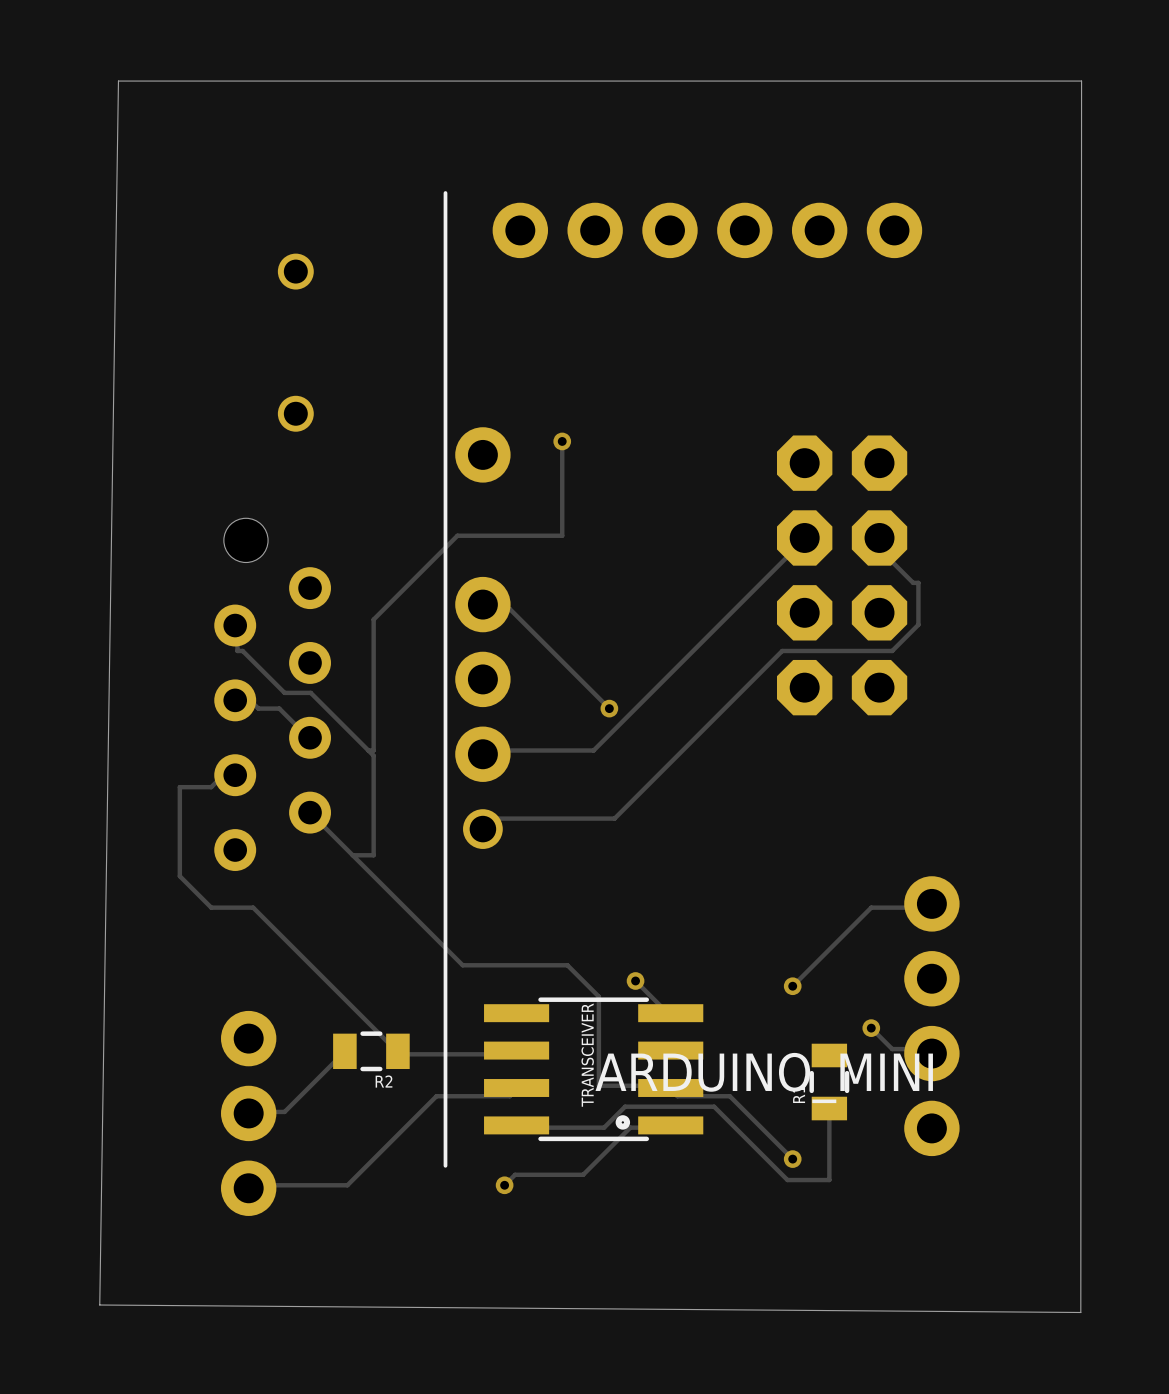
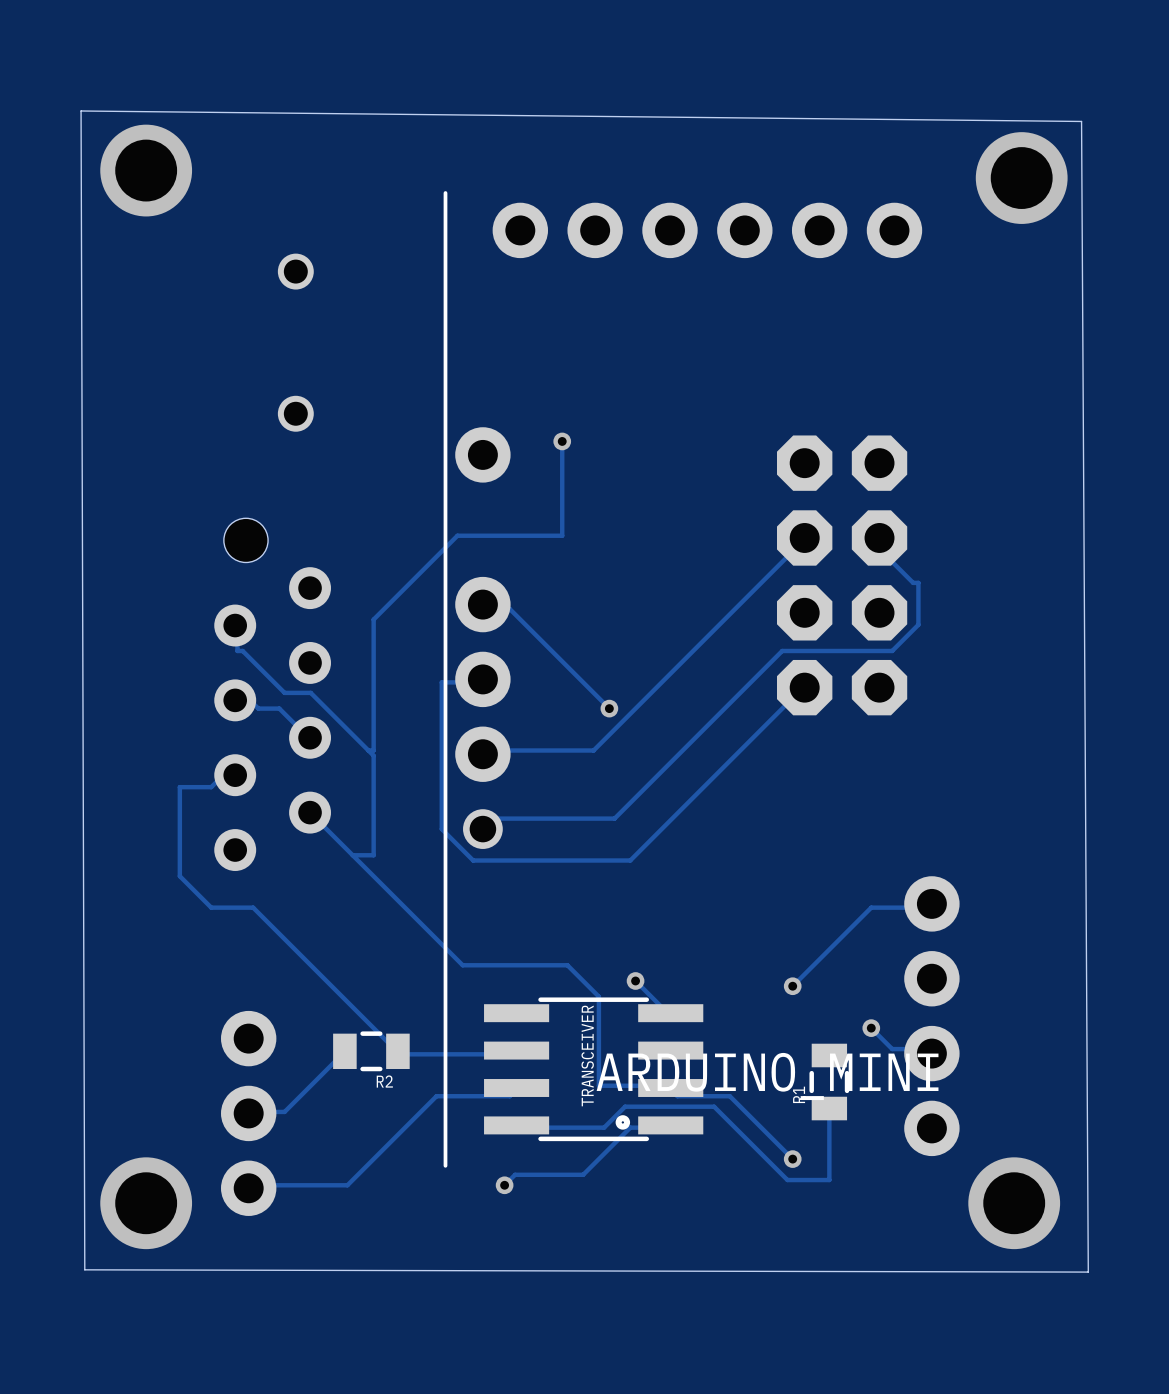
board edge: (1081, 81) (118, 81) (99, 1305) (1080, 1312) (1081, 81) -> (81, 110) (1081, 121) (1088, 1272) (84, 1269) (81, 110)
via: none -> (146, 170)
via: none -> (1021, 178)
track: none -> (482, 679) (478, 682) (441, 682) (441, 829) (473, 860) (630, 860) (804, 687)
via: none -> (146, 1203)
via: none -> (1014, 1203)

